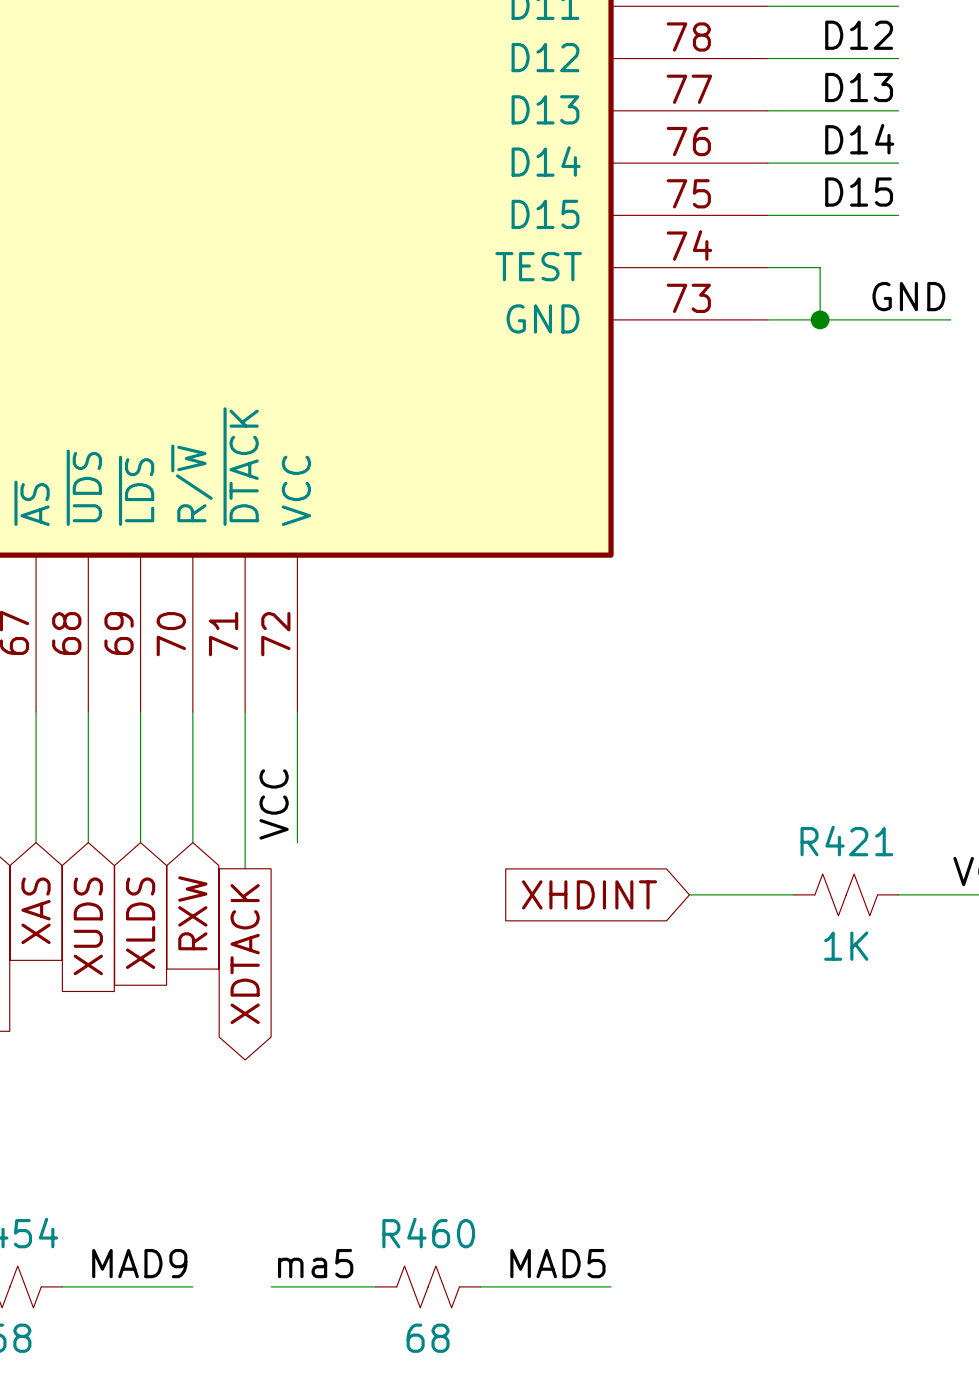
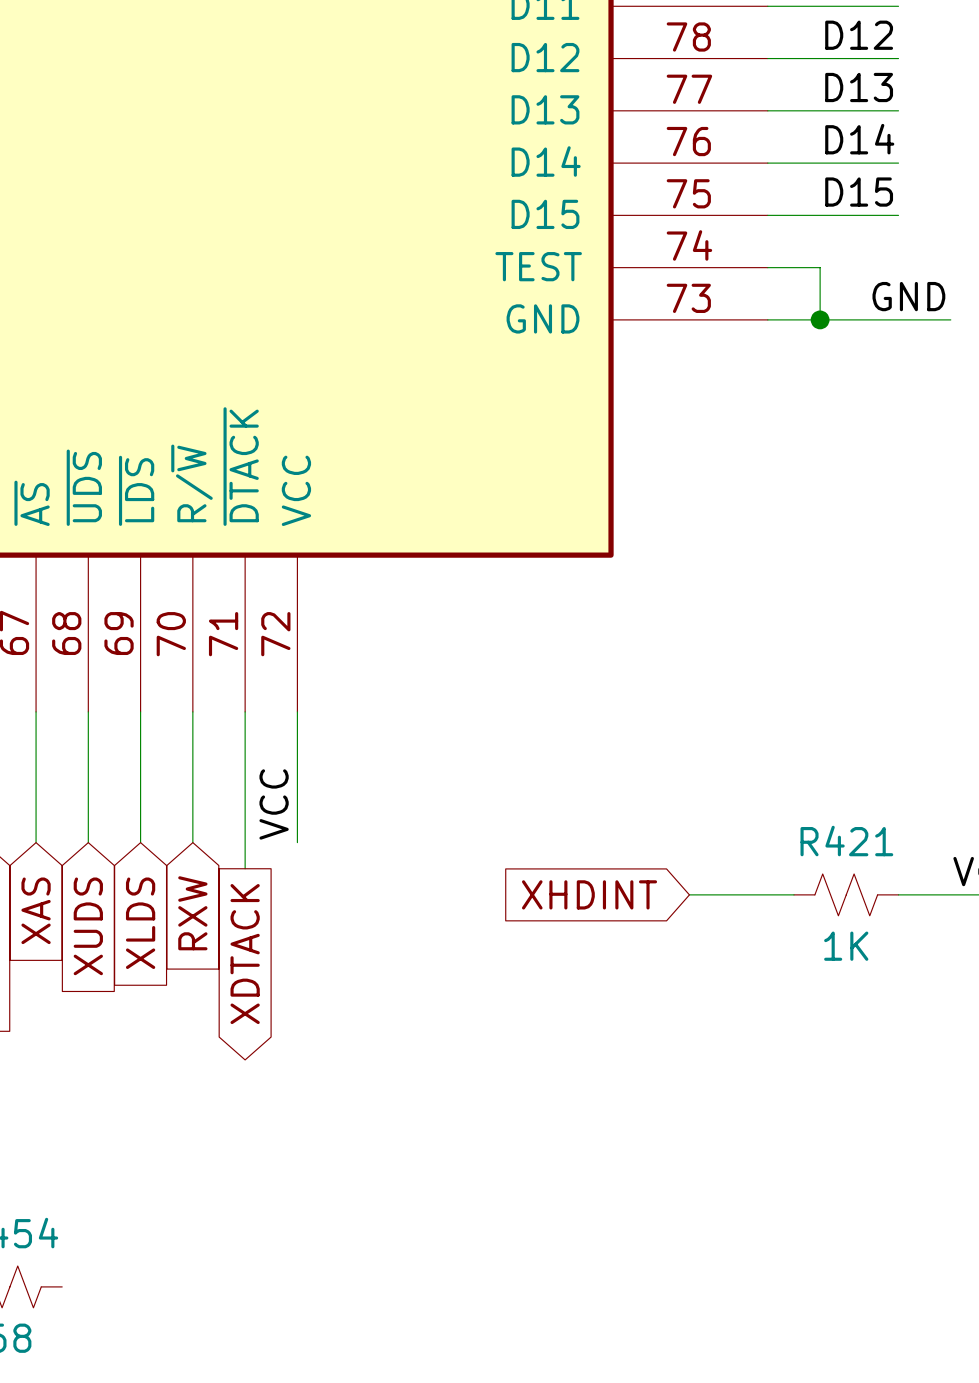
label: MAD9 (139, 1263) -> none
label: ma5 (315, 1263) -> none
label: MAD5 (557, 1263) -> none
wire: (62, 1286) (192, 1286) -> none
wire: (271, 1286) (375, 1286) -> none
R460: 68 (428, 1286) -> none
wire: (480, 1286) (611, 1286) -> none

